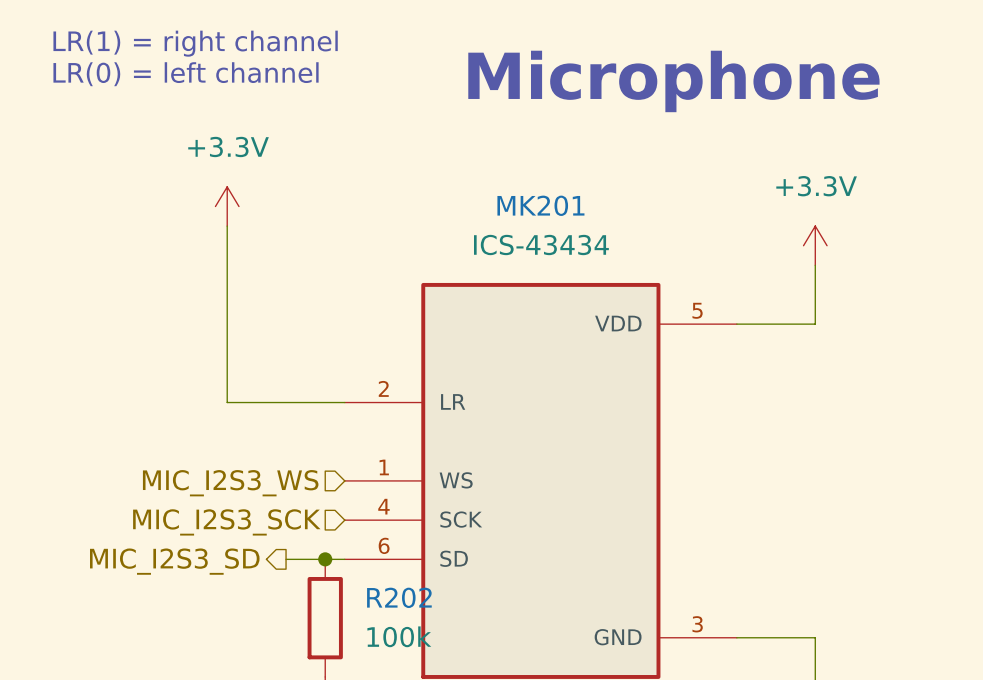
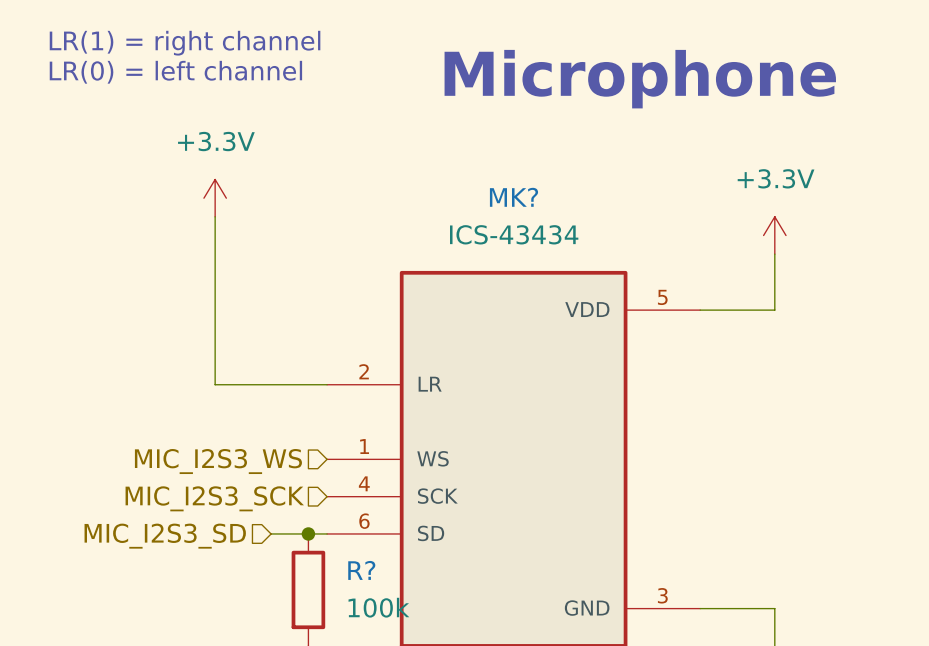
MK201 name: MK201 (540, 205) -> MK? (513, 197)
hierarchical label shape: output (174, 561) -> input (165, 536)
R202 name: R202 (399, 597) -> R? (361, 570)

